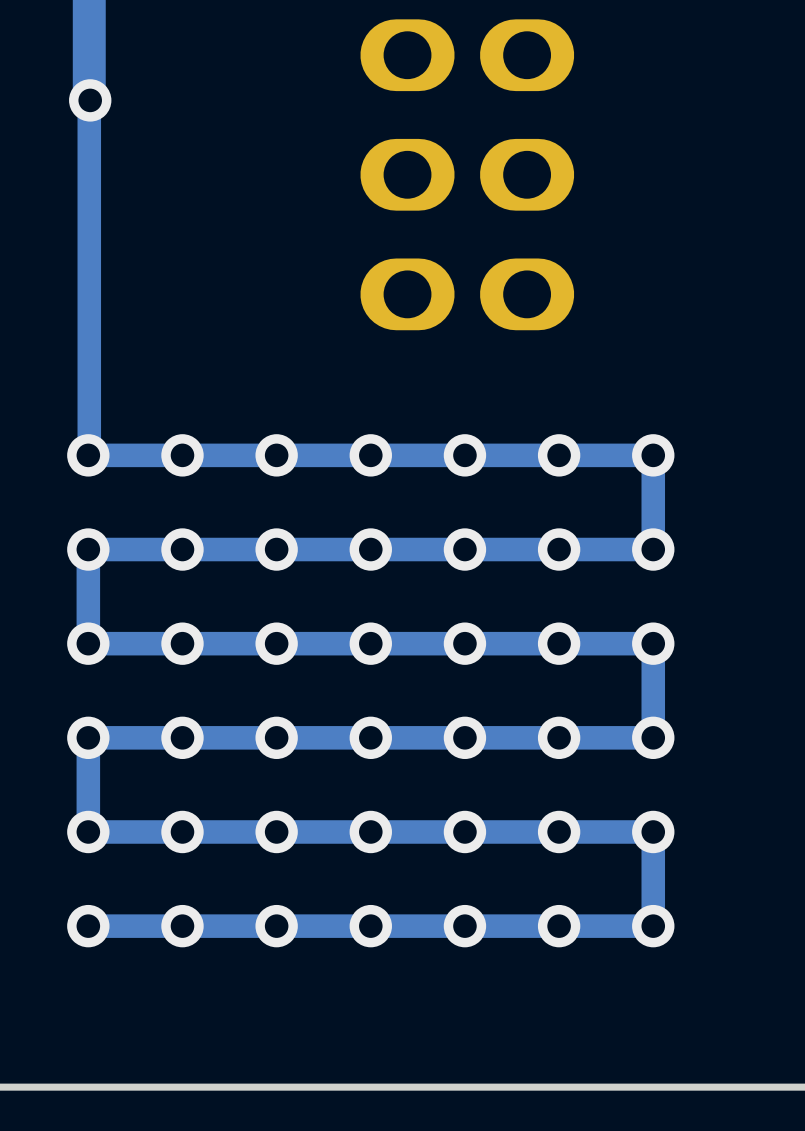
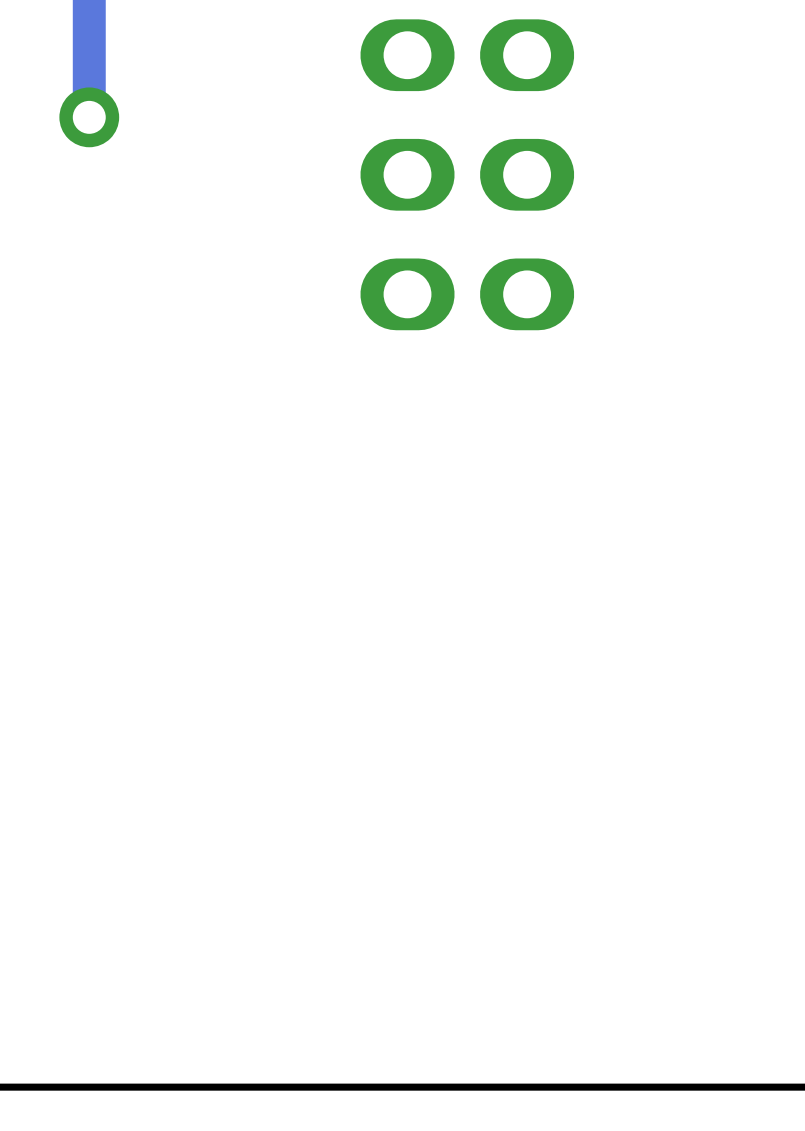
via size: [69, 79, 112, 122] -> [59, 87, 120, 148]
track: (89, 117) (88, 455) (653, 455) (653, 549) (88, 549) (88, 643) (653, 643) (653, 737) (88, 737) (88, 831) (653, 831) (653, 926) (88, 926) -> none
via: (88, 455) -> none
via: (182, 455) -> none
via: (276, 455) -> none
via: (370, 455) -> none
via: (464, 455) -> none
via: (559, 455) -> none
via: (653, 455) -> none
via: (88, 549) -> none
via: (182, 549) -> none
via: (276, 549) -> none
via: (370, 549) -> none
via: (464, 549) -> none
via: (559, 549) -> none
via: (653, 549) -> none
via: (88, 643) -> none
via: (182, 643) -> none
via: (276, 643) -> none
via: (370, 643) -> none
via: (464, 643) -> none
via: (559, 643) -> none
via: (653, 643) -> none
via: (88, 737) -> none
via: (182, 737) -> none
via: (276, 737) -> none
via: (370, 737) -> none
via: (464, 737) -> none
via: (559, 737) -> none
via: (653, 737) -> none
via: (88, 831) -> none
via: (182, 831) -> none
via: (276, 831) -> none
via: (370, 831) -> none
via: (464, 831) -> none
via: (559, 831) -> none
via: (653, 831) -> none
via: (88, 926) -> none
via: (182, 926) -> none
via: (276, 926) -> none
via: (370, 926) -> none
via: (464, 926) -> none
via: (559, 926) -> none
via: (653, 926) -> none

